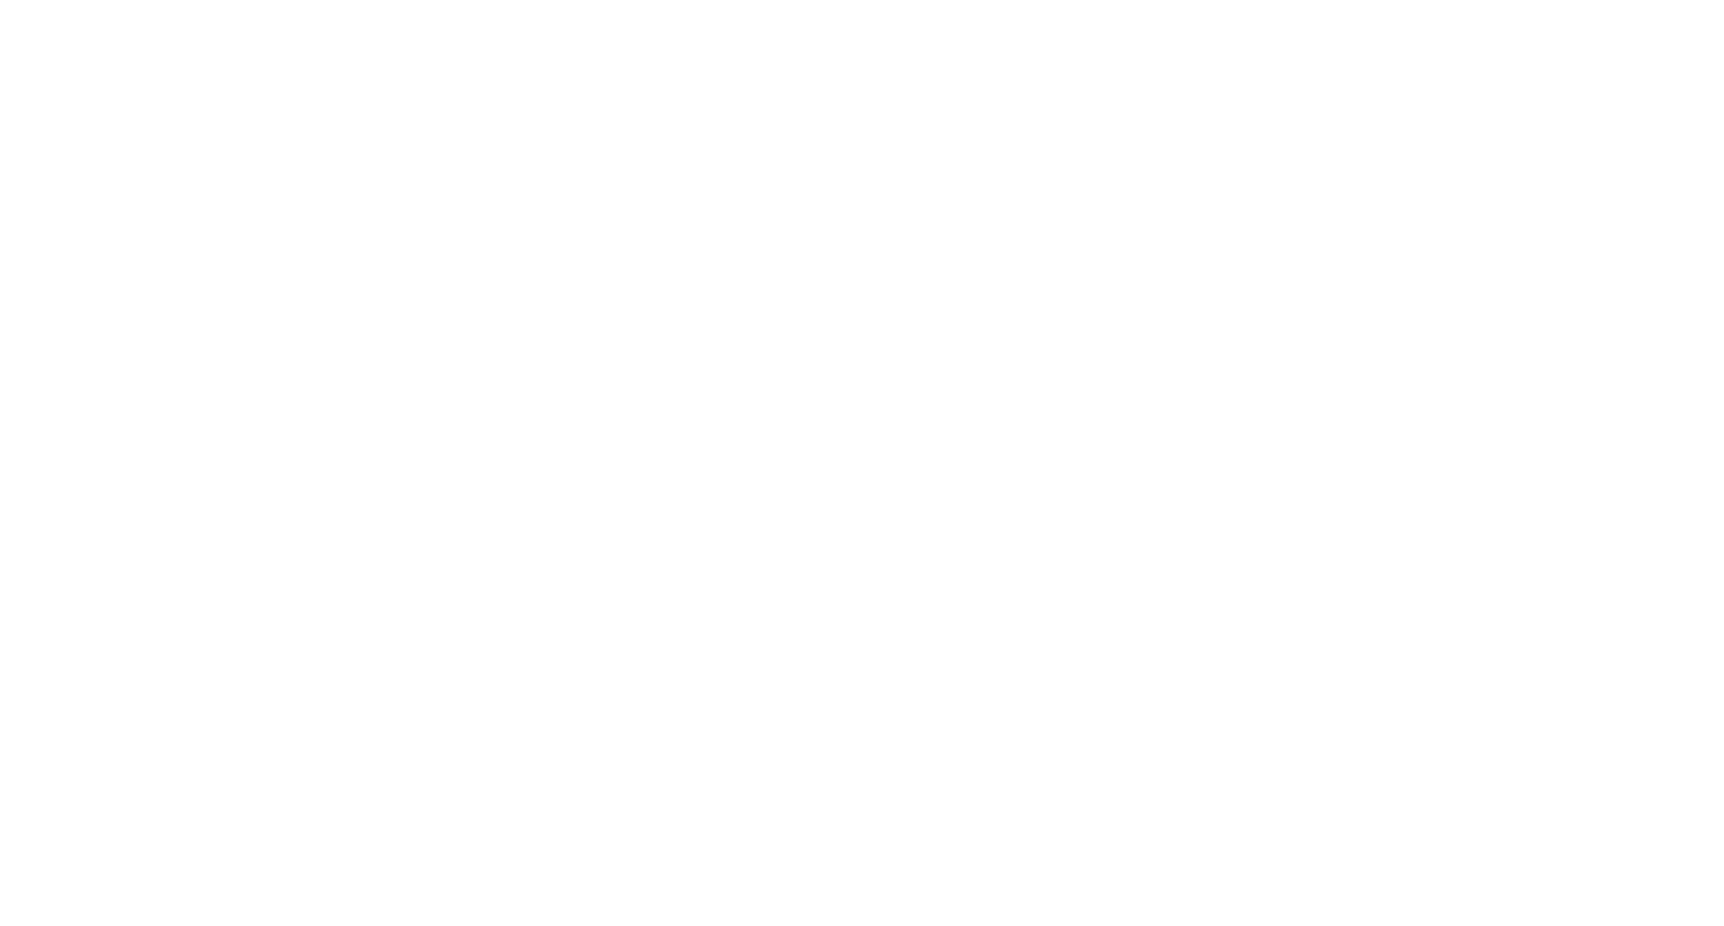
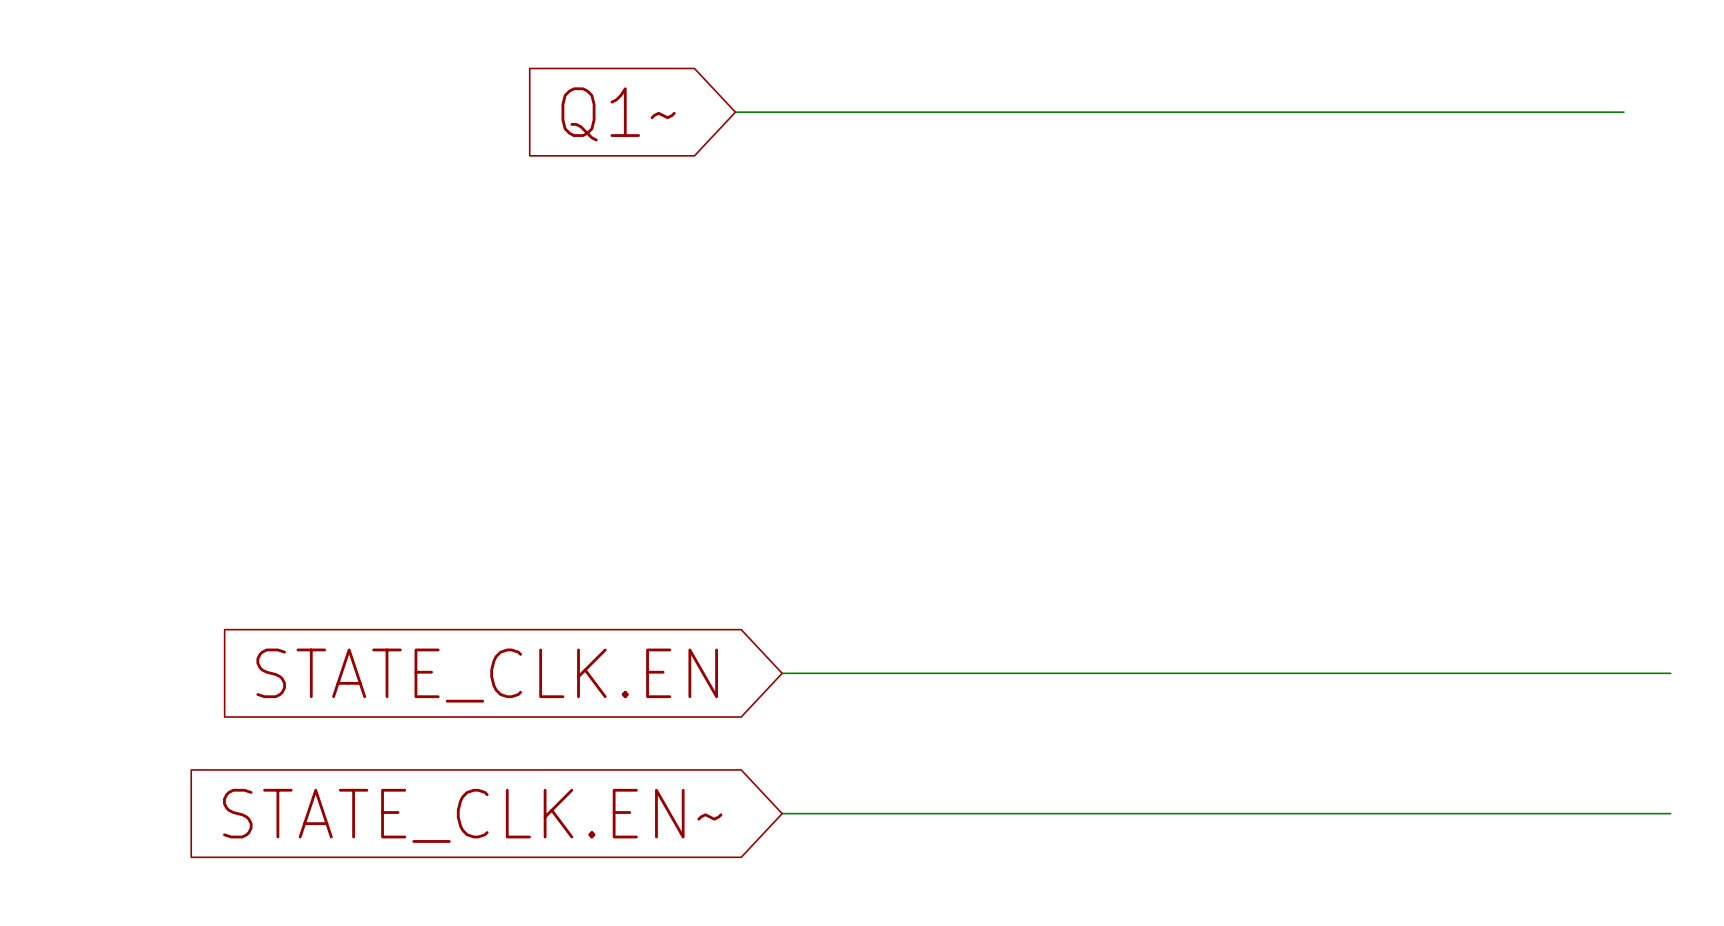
wire: none -> (735, 112) (1623, 112)
global label: none -> Q1~ (618, 114)
wire: none -> (782, 673) (1670, 673)
global label: none -> STATE_CLK.EN (487, 675)
wire: none -> (782, 813) (1670, 813)
global label: none -> STATE_CLK.EN~ (472, 815)

